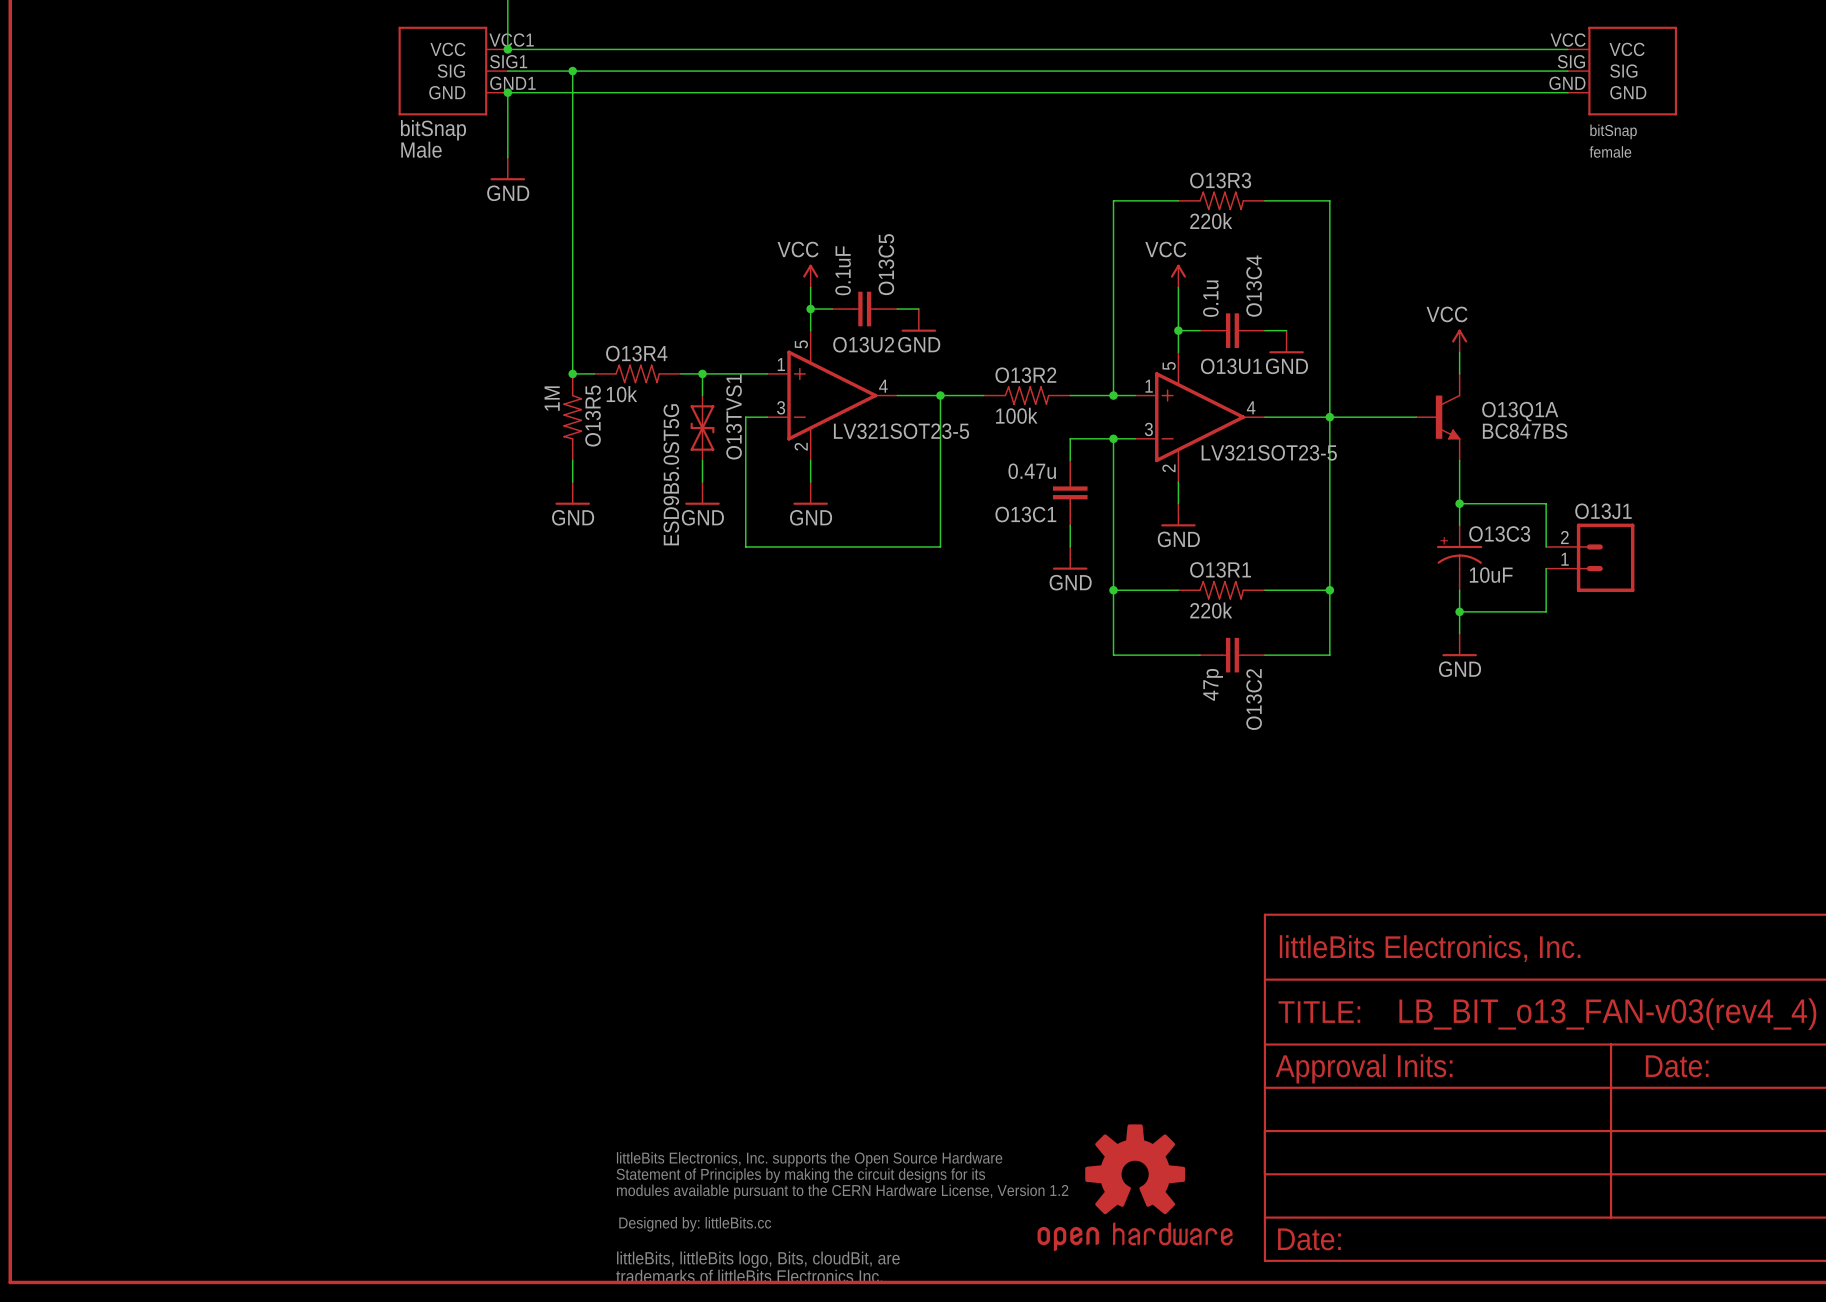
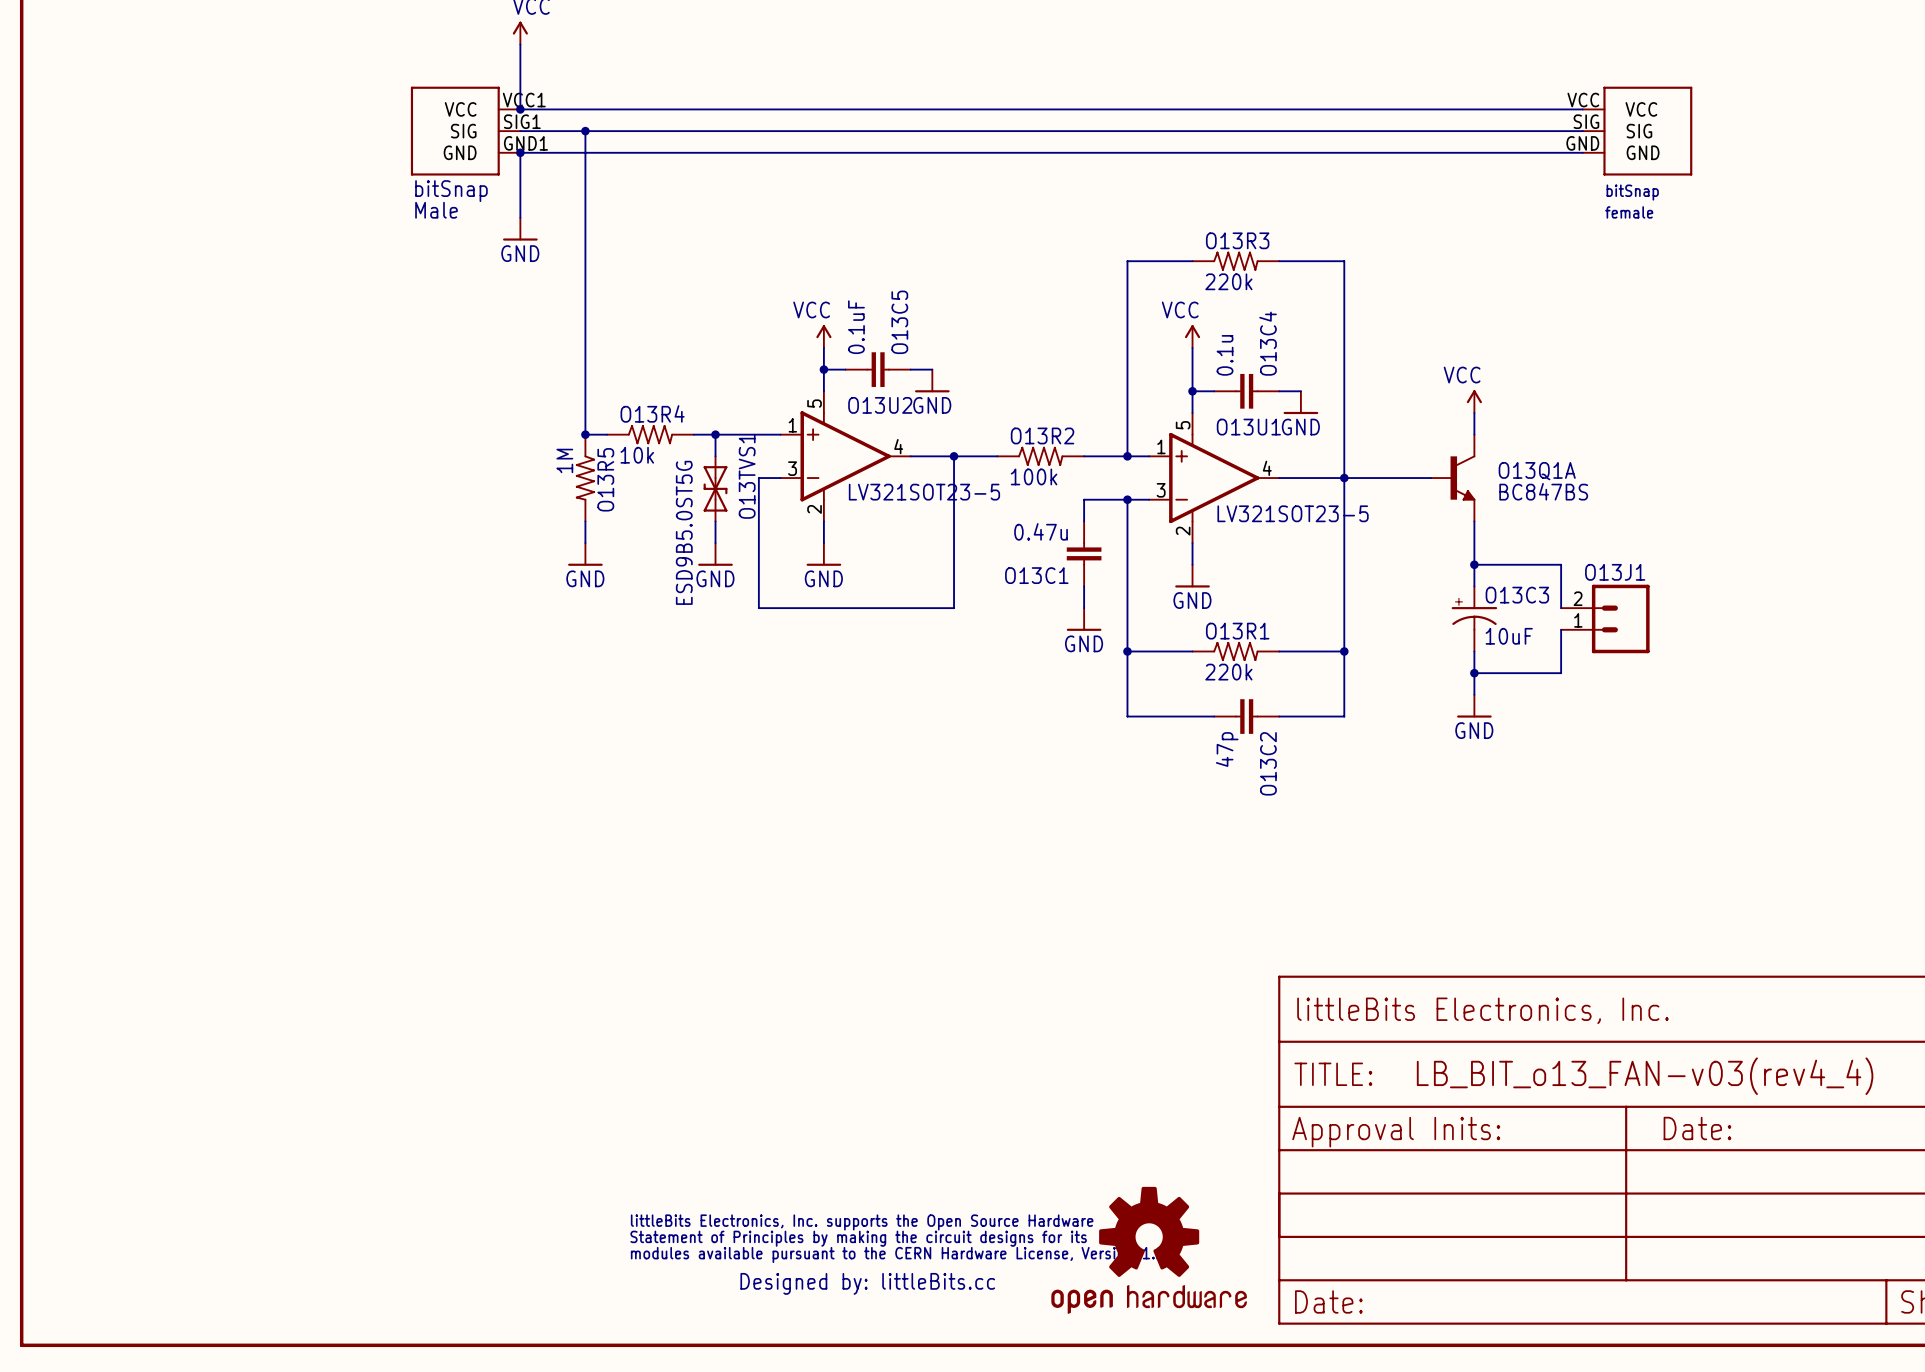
part: none -> (897, 1254)
part: (842, 1217) -> none

